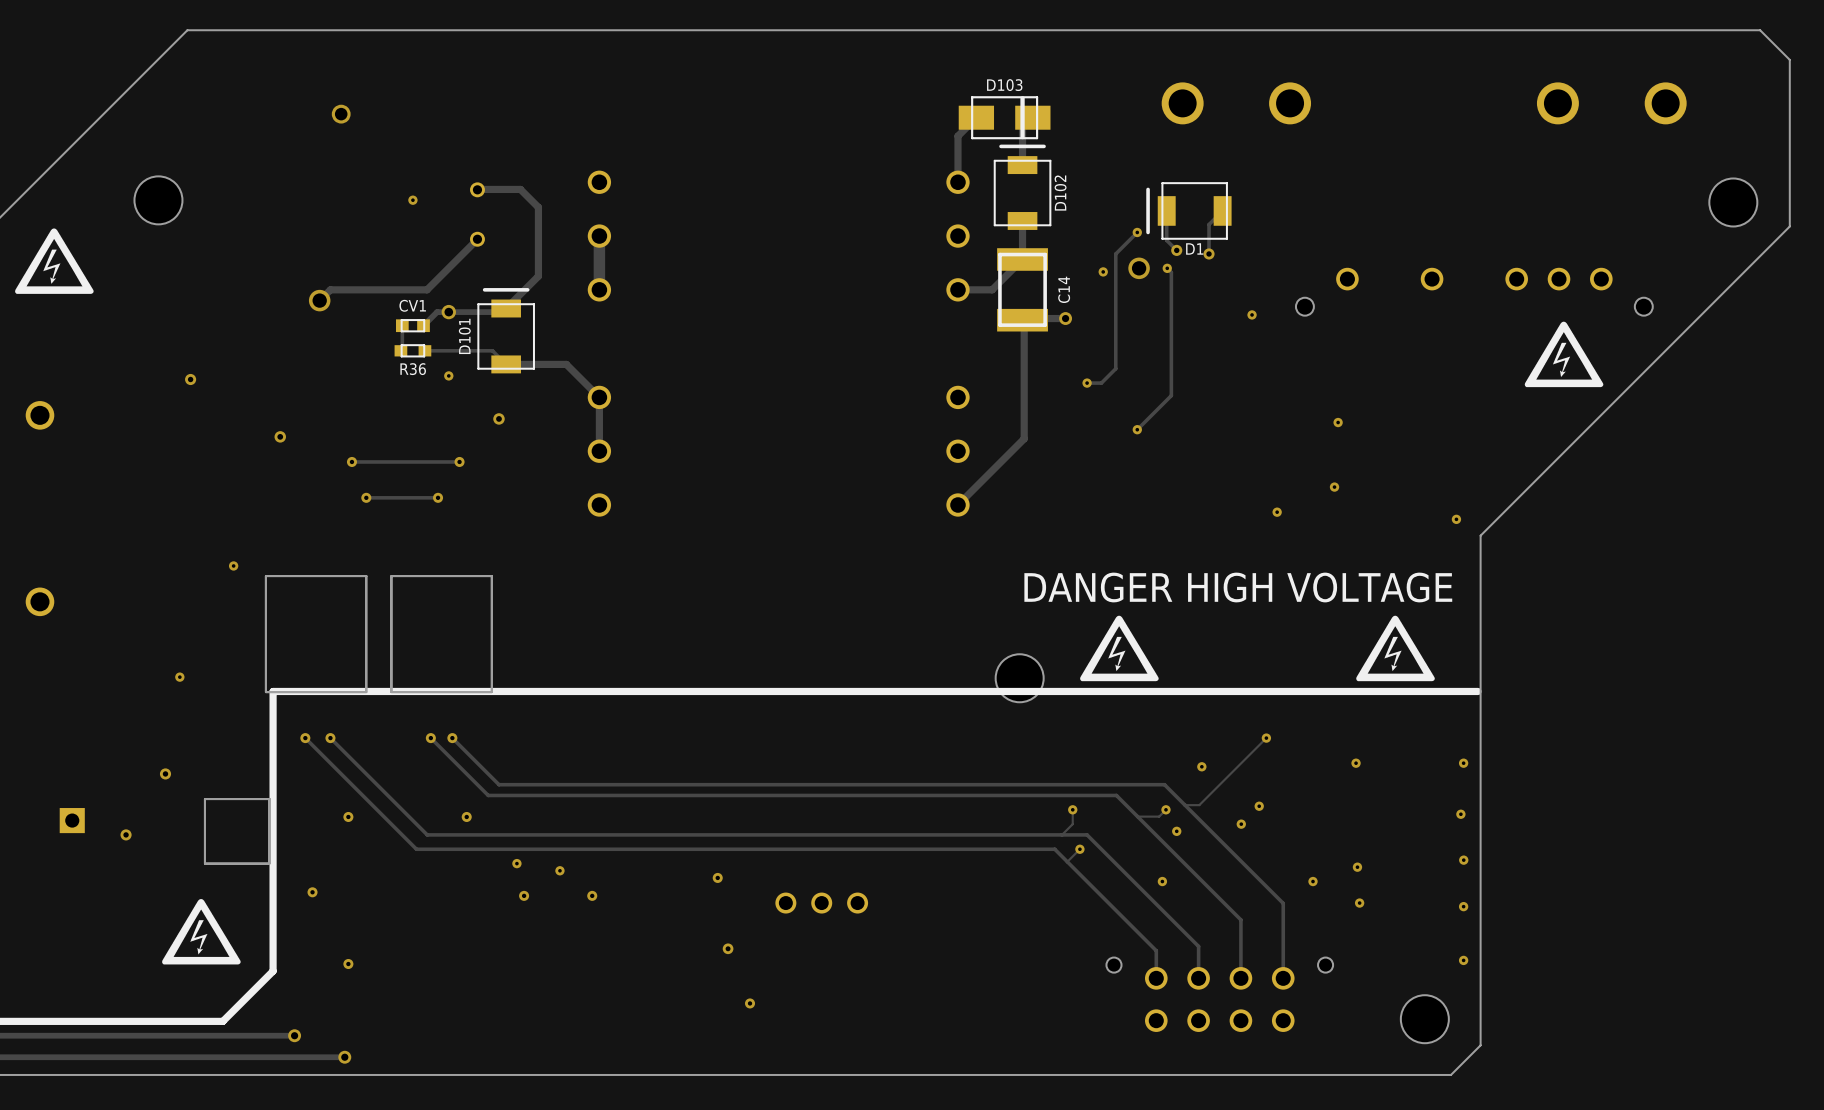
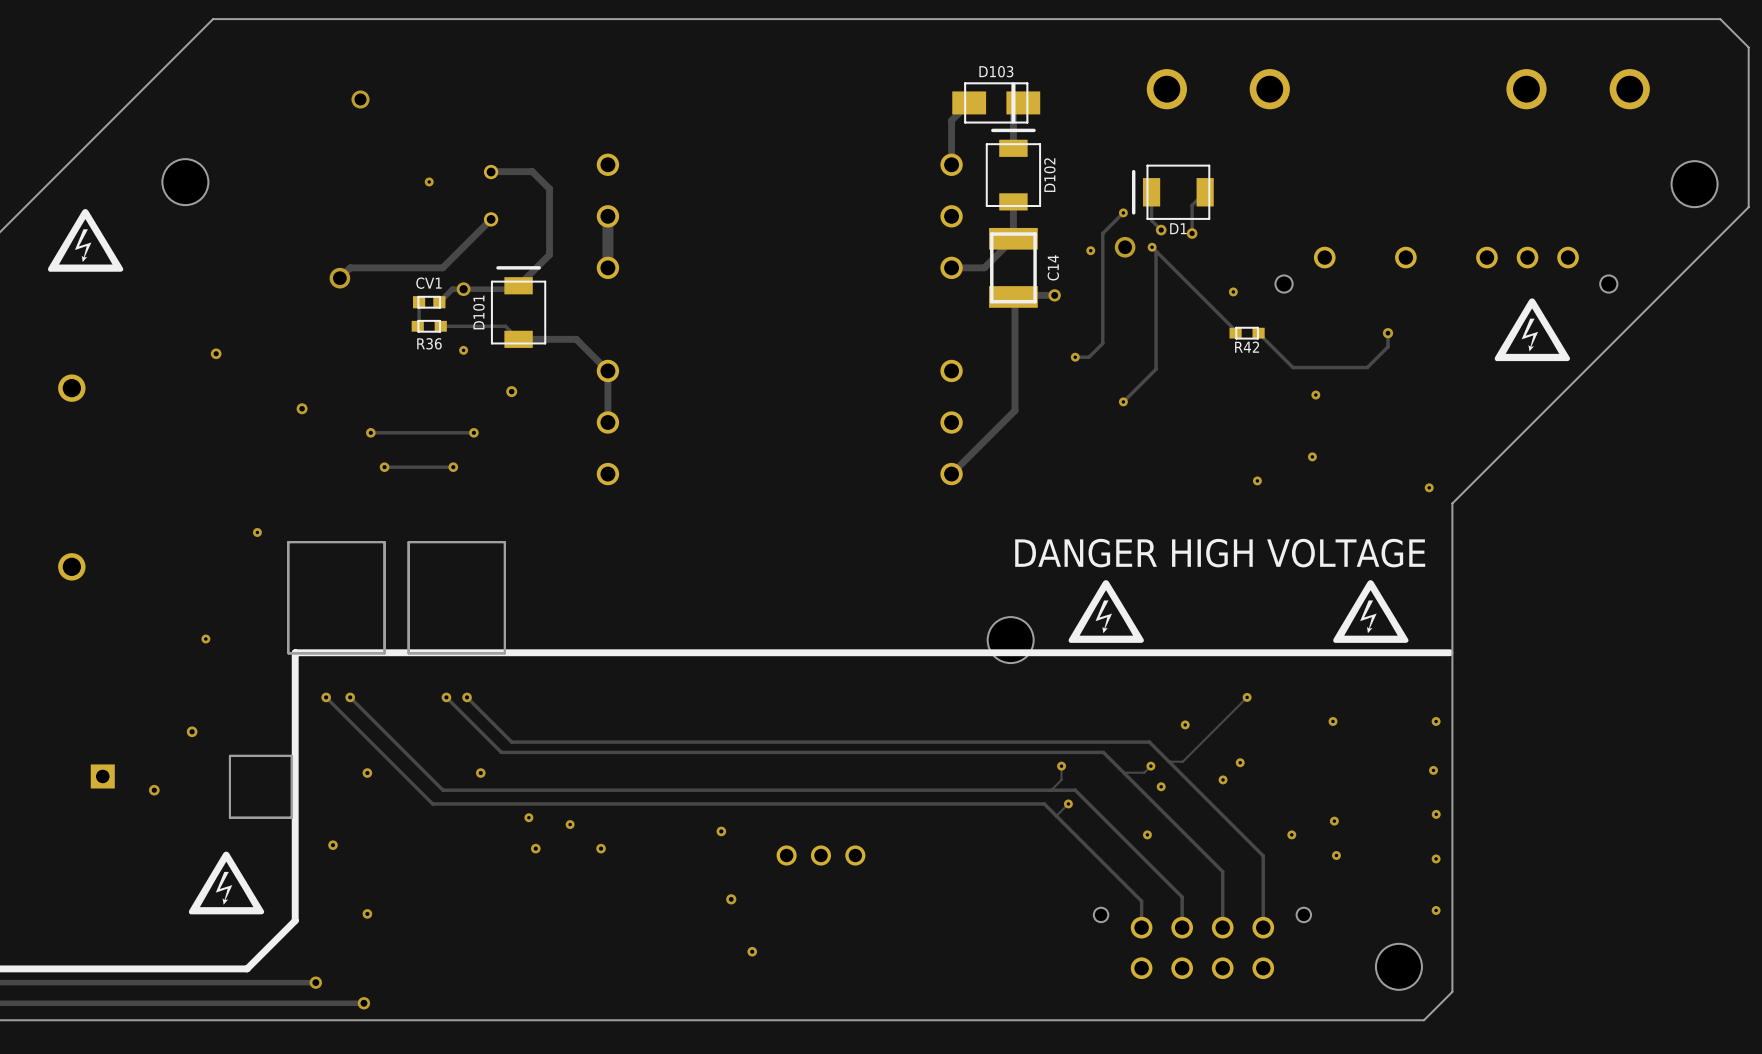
track: none -> (1156, 251) (1235, 330) (1235, 333)
R42: none -> (1247, 333)
track: none -> (1388, 333) (1388, 346) (1367, 367) (1292, 367) (1258, 333)
via: none -> (1388, 333)

